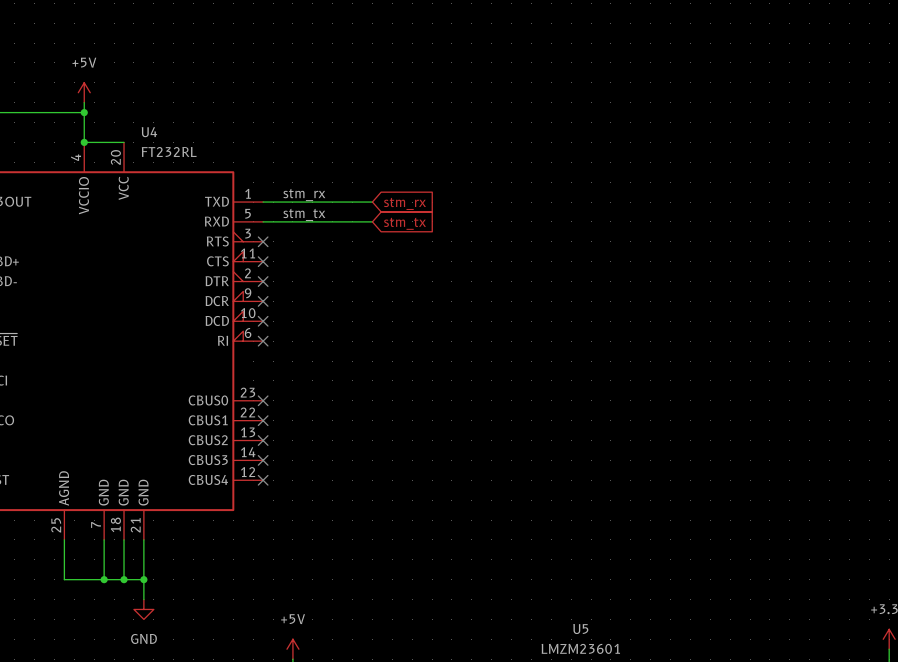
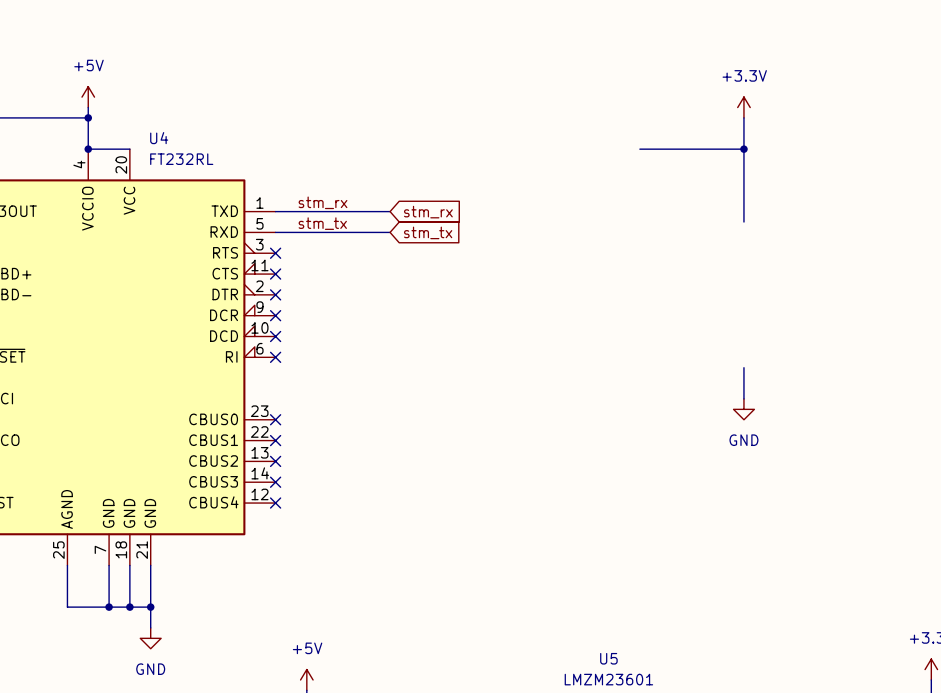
power symbol: none -> +3.3V (743, 107)
wire: none -> (743, 117) (743, 222)
wire: none -> (639, 149) (743, 149)
junction: none -> (743, 149)
wire: none -> (743, 367) (743, 398)
power symbol: none -> GND (743, 409)

